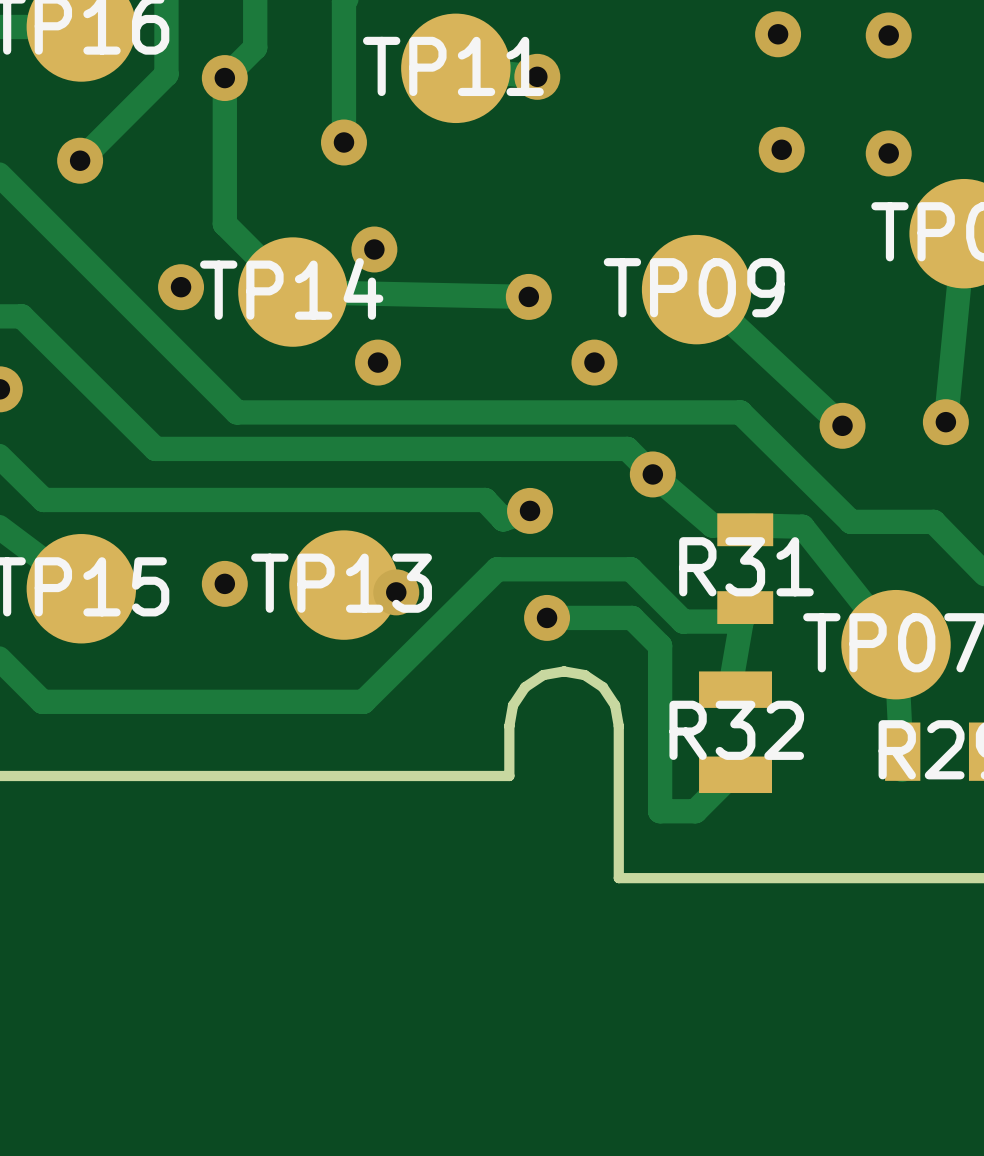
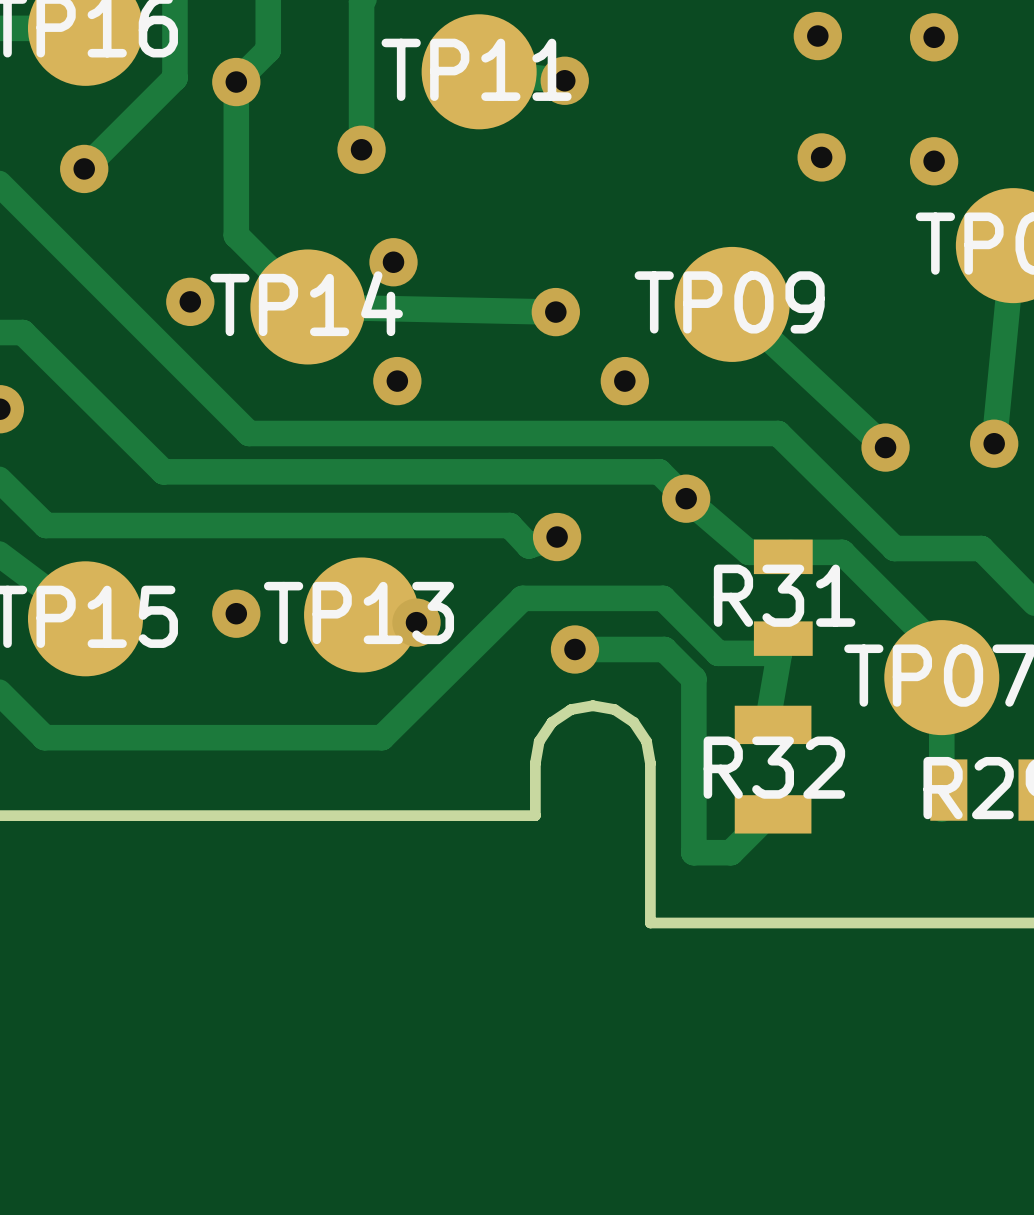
track: (752, 525) (802, 526) (896, 644) (902, 769) -> (790, 552) (842, 552) (941, 652) (941, 809)

